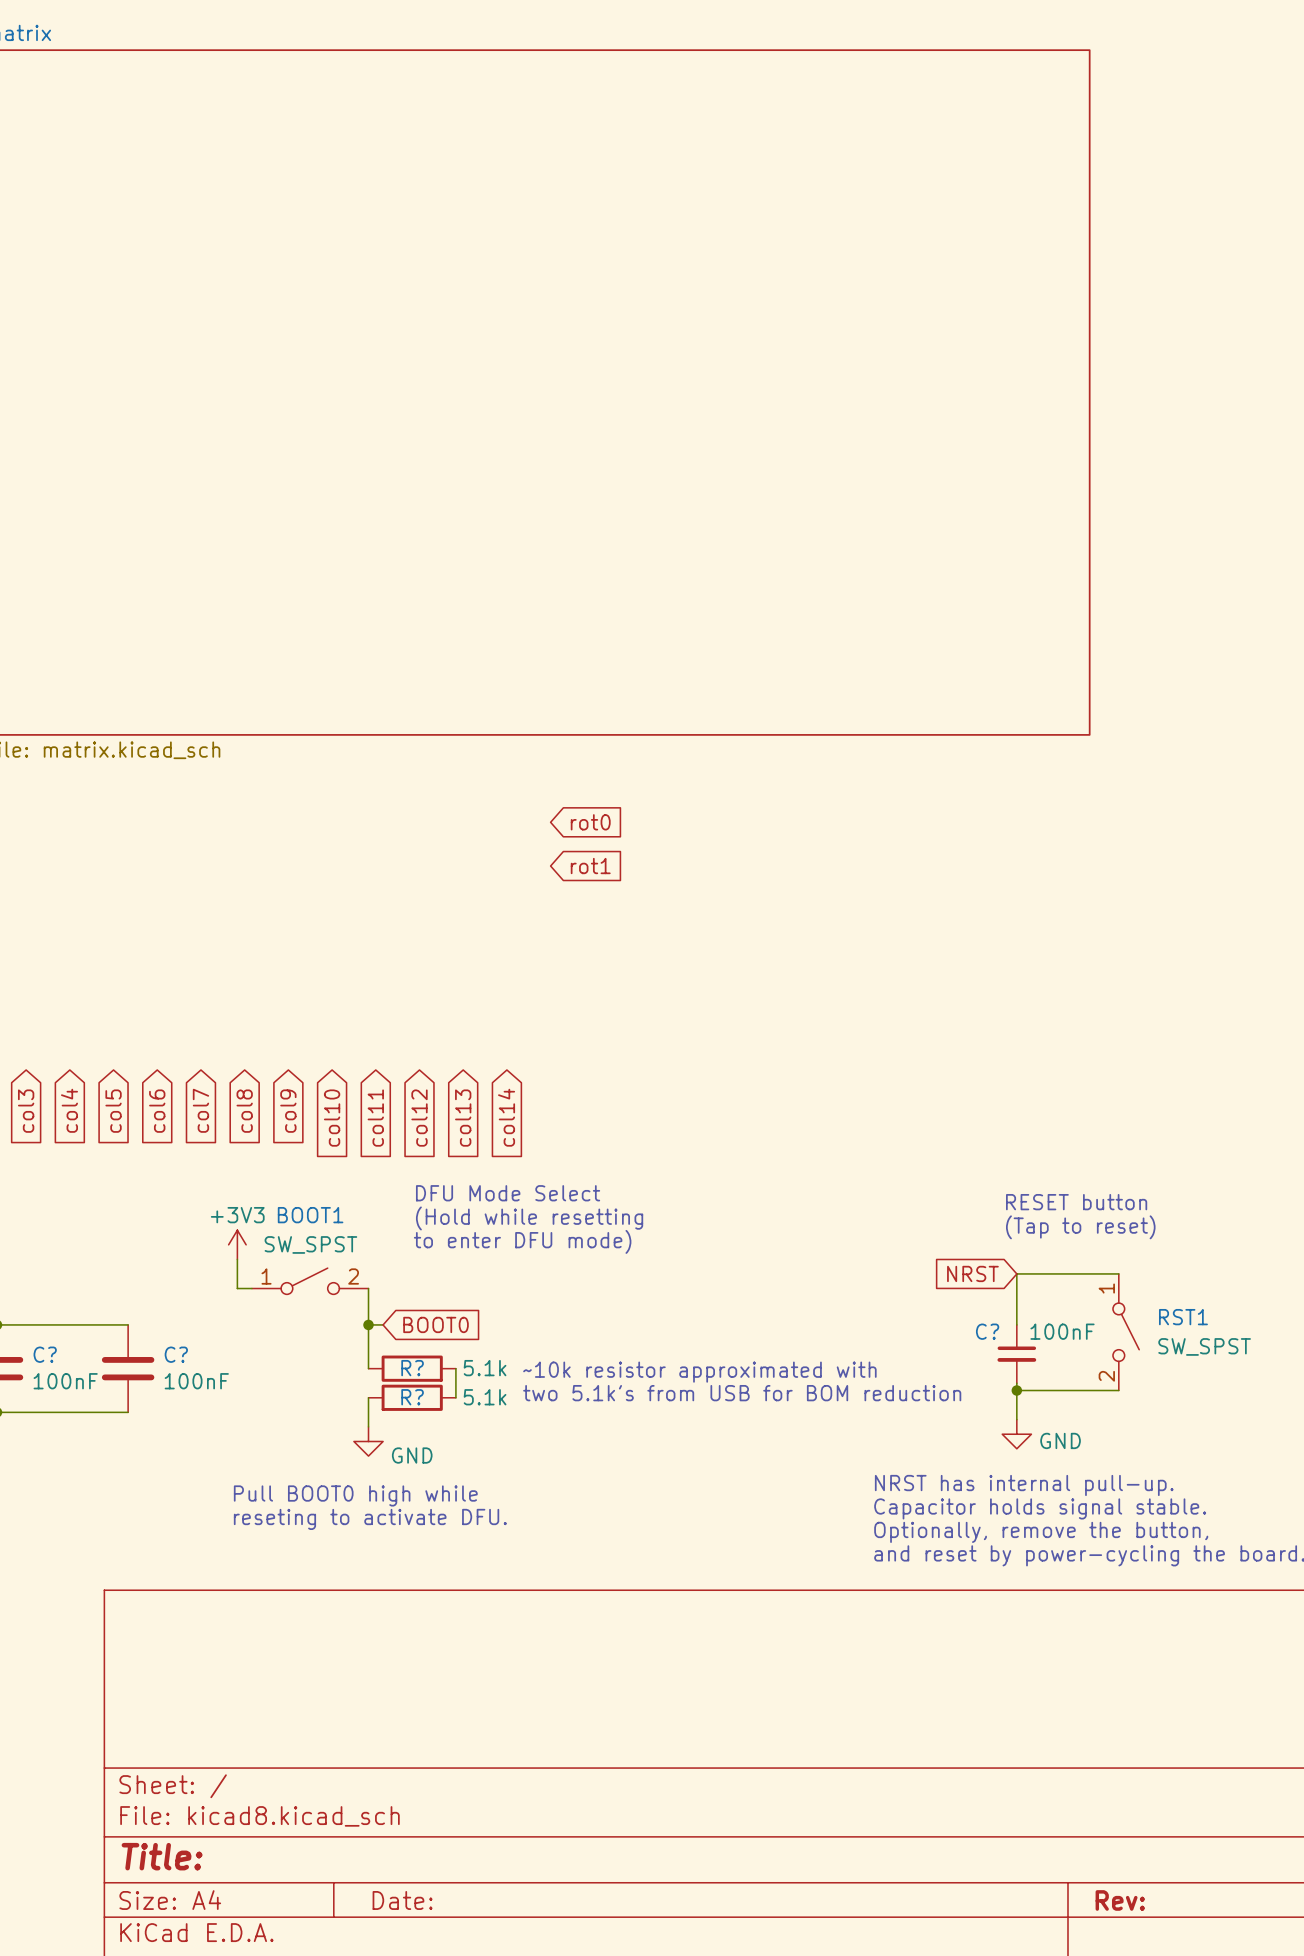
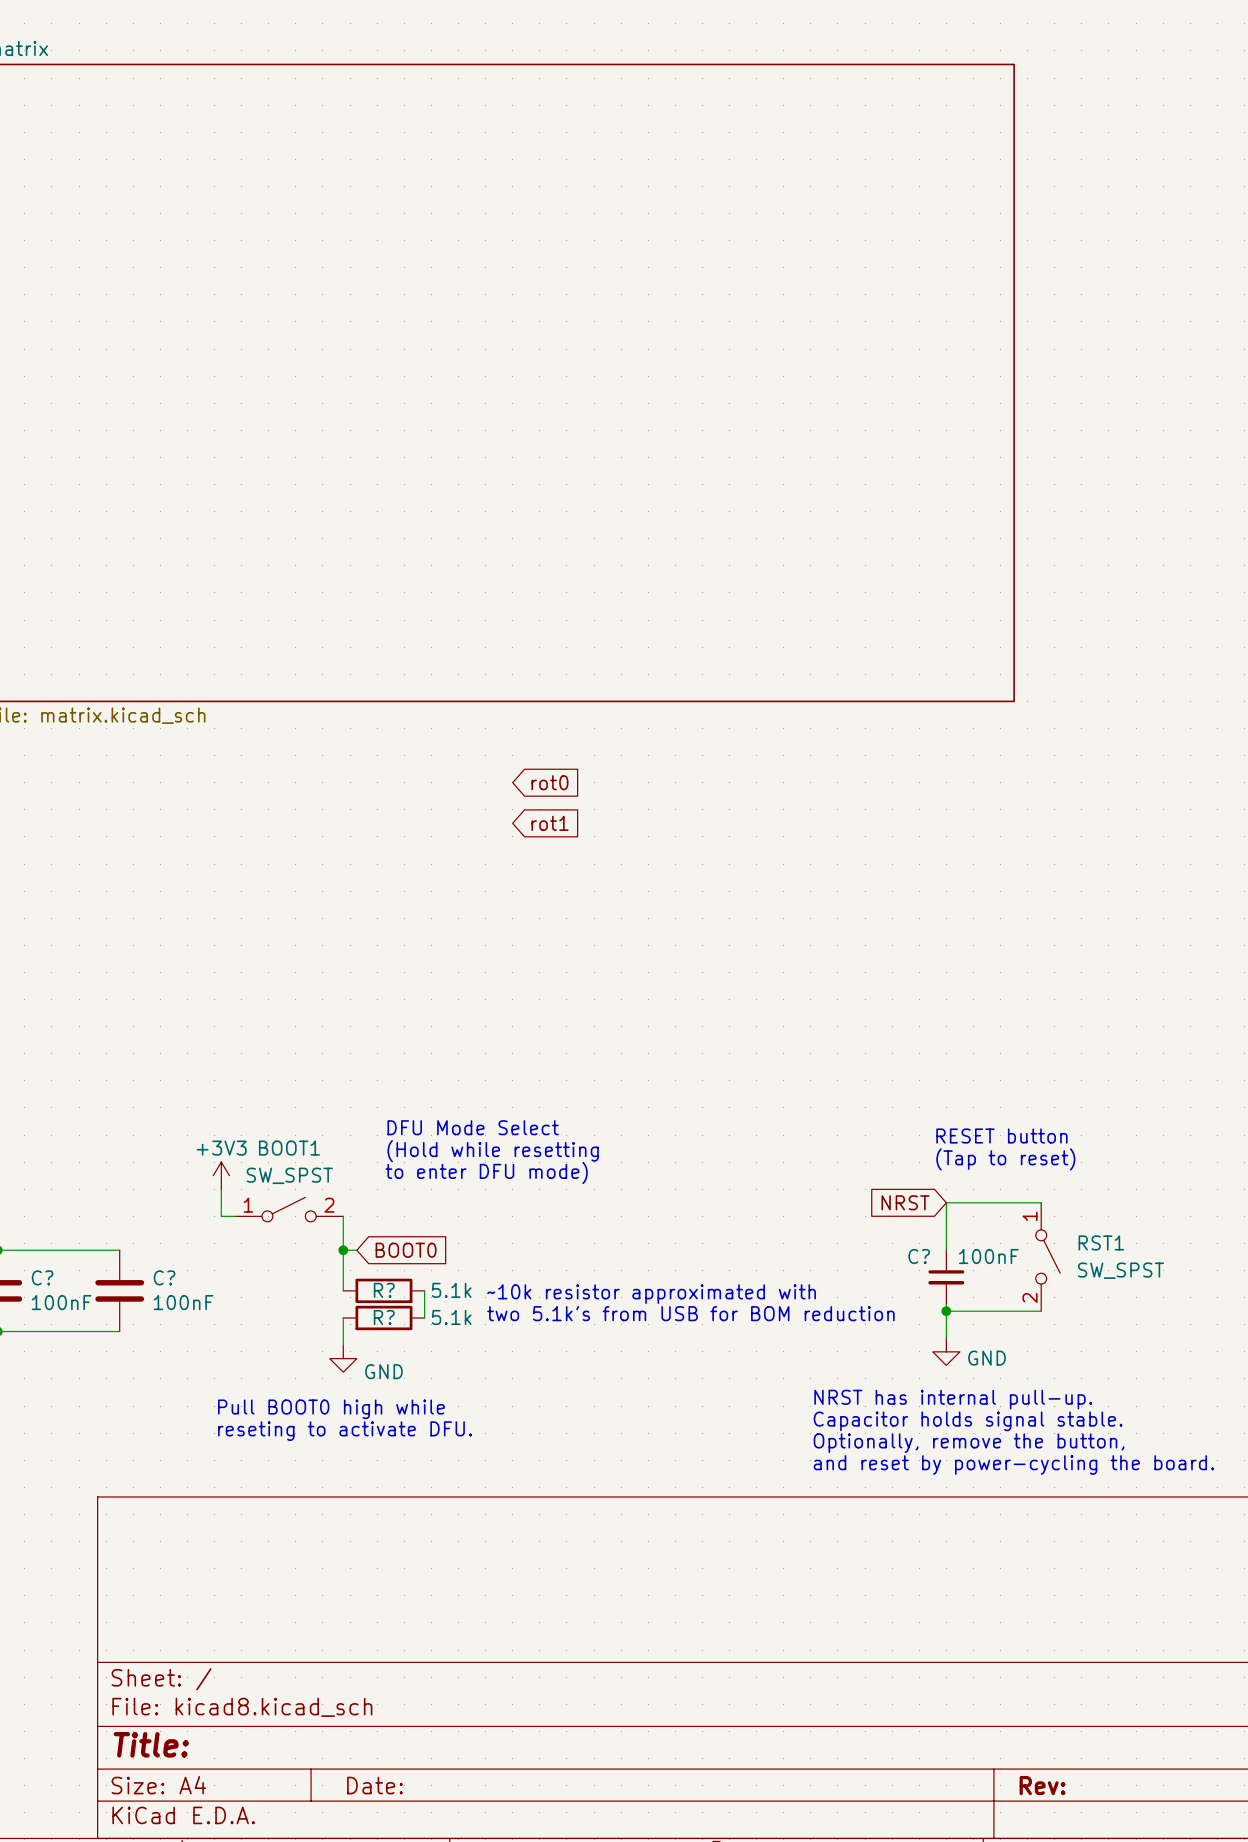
global label: col4 (69, 1110) -> none
global label: col7 (200, 1110) -> none
global label: col3 (26, 1111) -> none
global label: col5 (113, 1111) -> none
global label: col6 (157, 1111) -> none
global label: col8 (244, 1111) -> none
global label: col9 (288, 1111) -> none
global label: col14 (506, 1117) -> none
global label: col10 (332, 1118) -> none
global label: col11 (375, 1118) -> none
global label: col12 (419, 1118) -> none
global label: col13 (463, 1118) -> none

